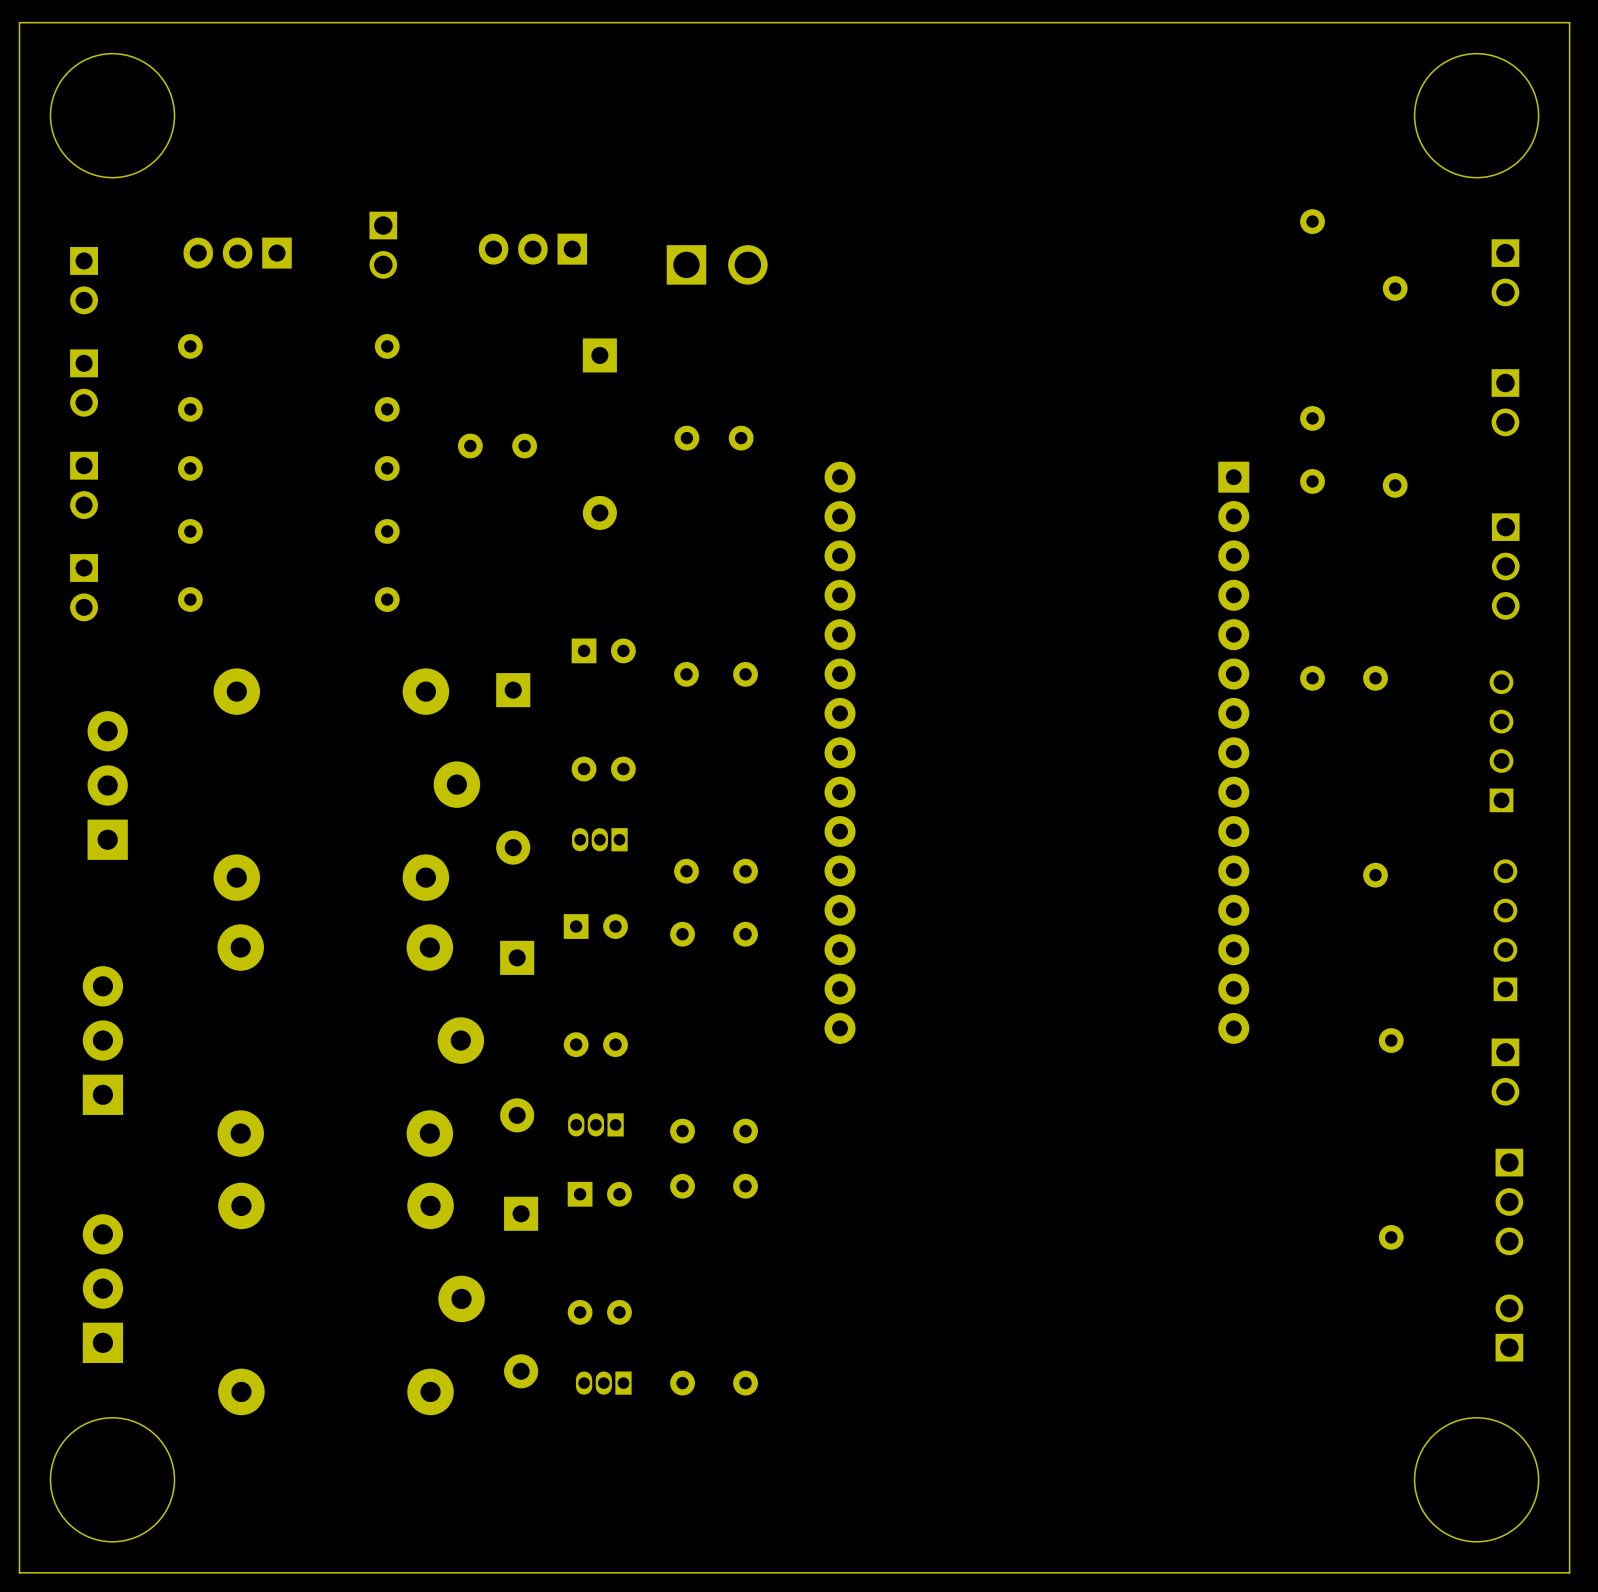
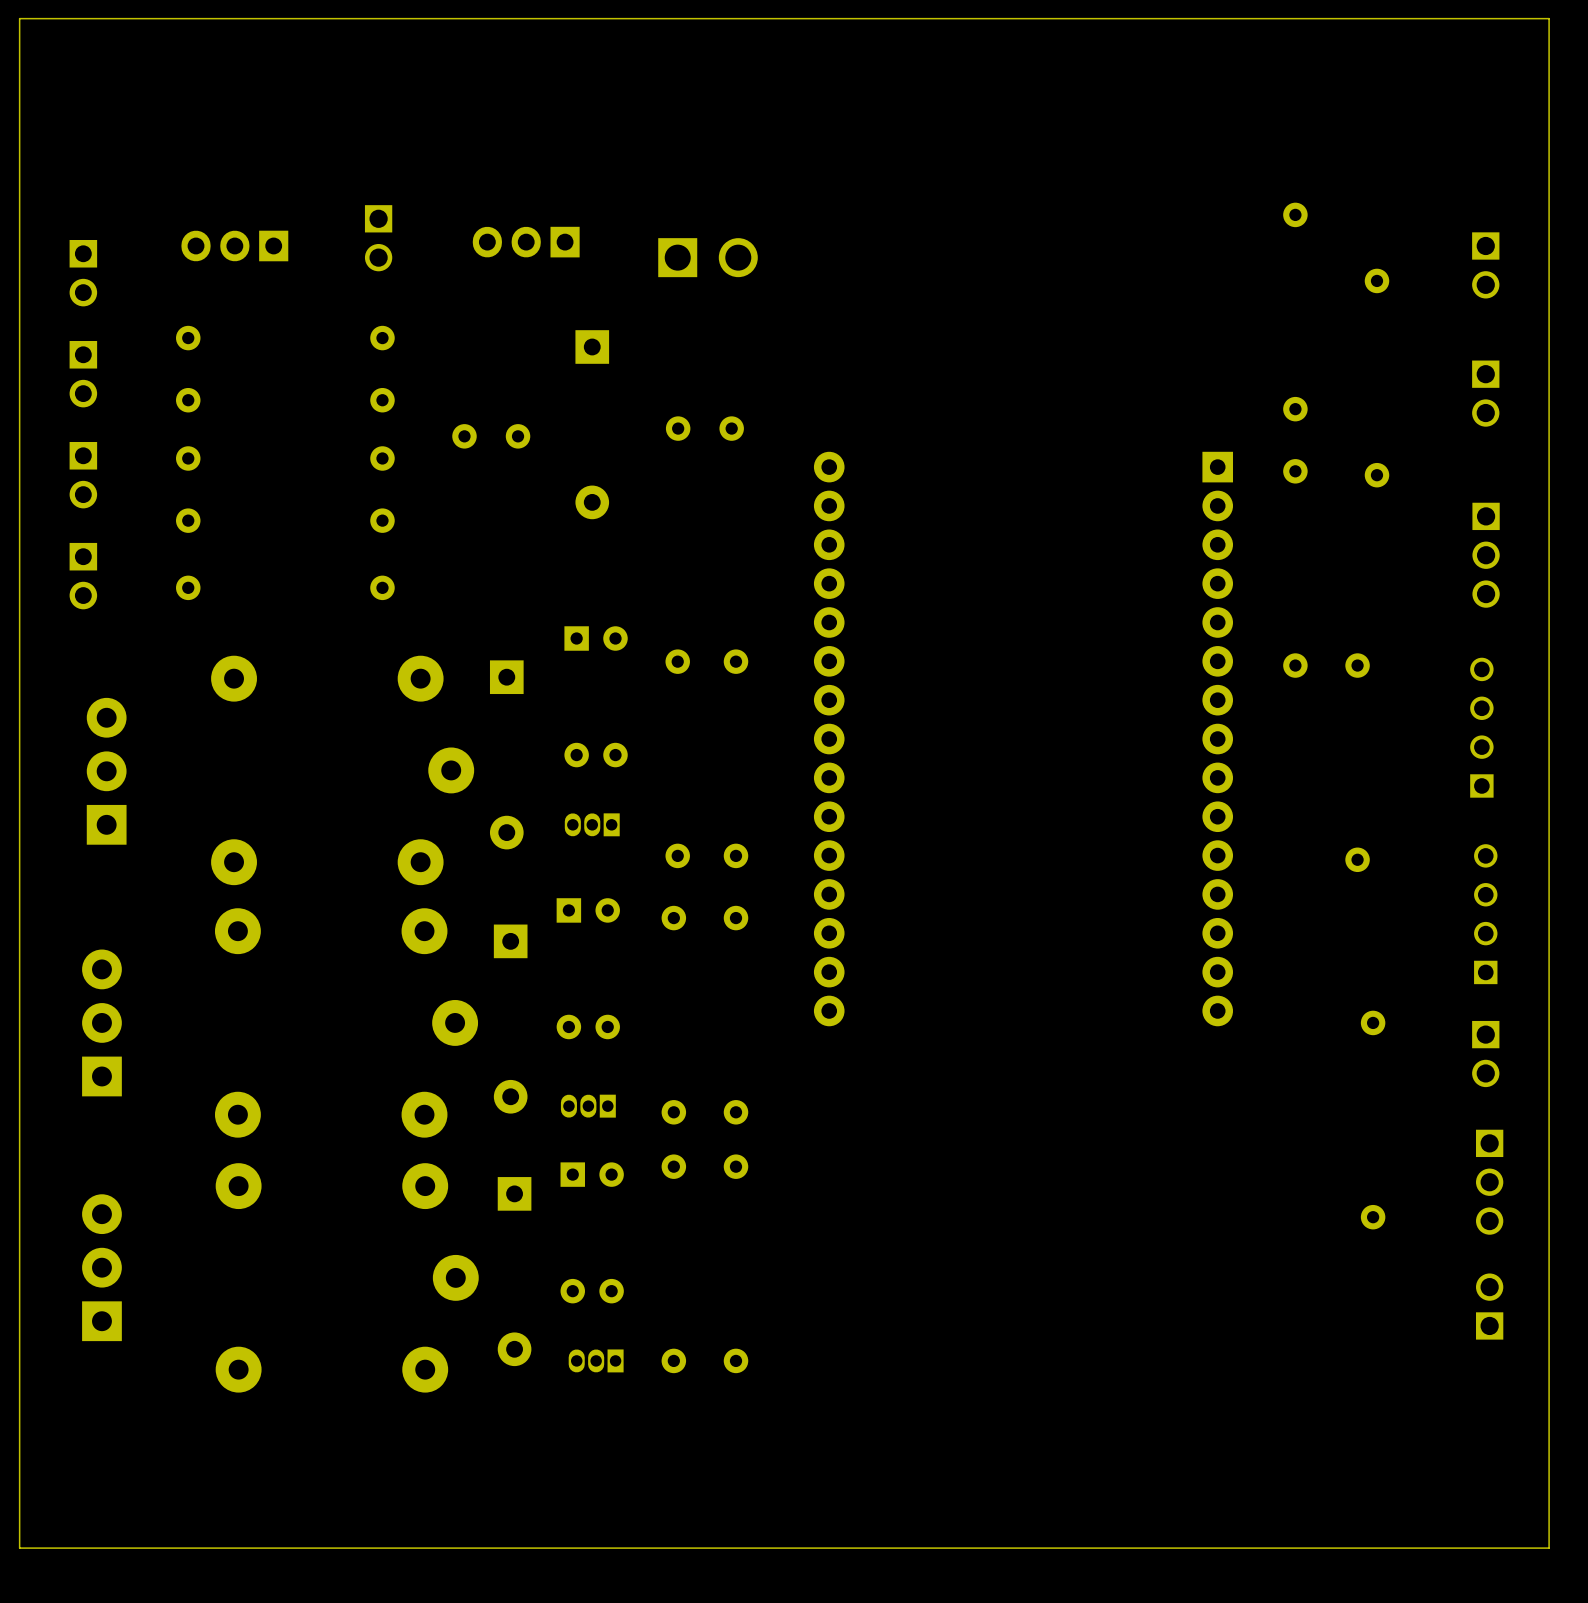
round board edge: [49, 52, 176, 179] -> none
round board edge: [1413, 52, 1540, 179] -> none
round board edge: [49, 1417, 176, 1543] -> none
round board edge: [1413, 1417, 1540, 1543] -> none

